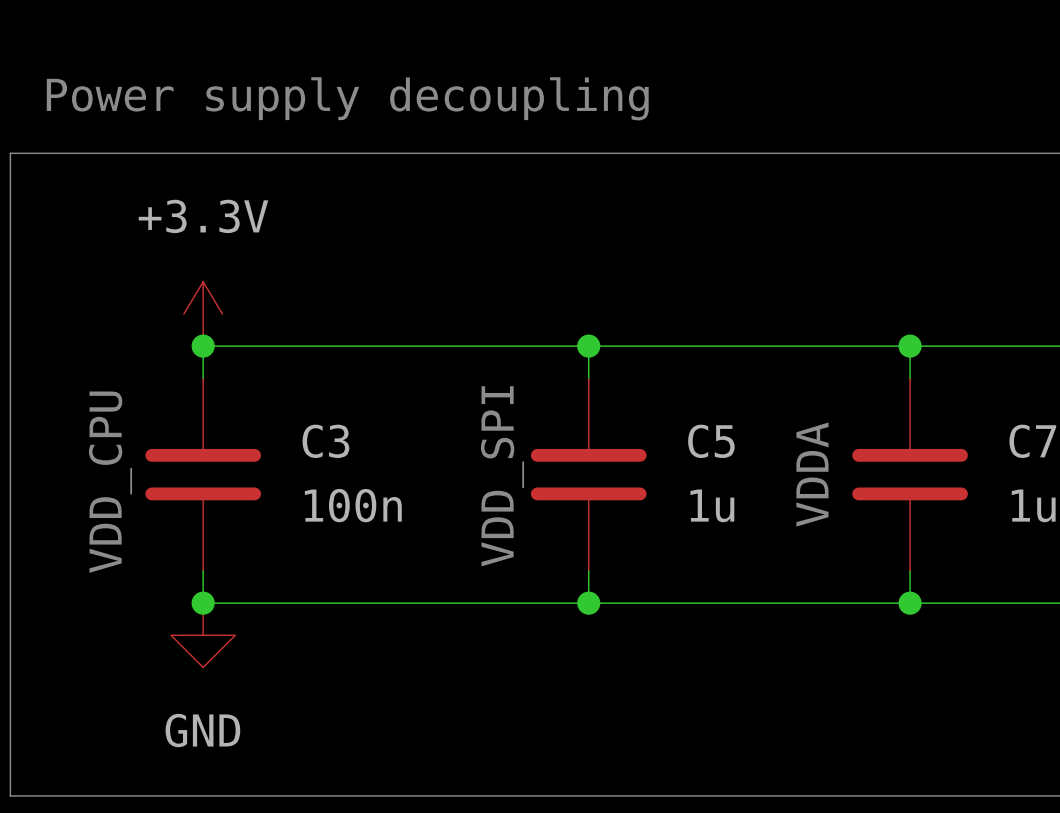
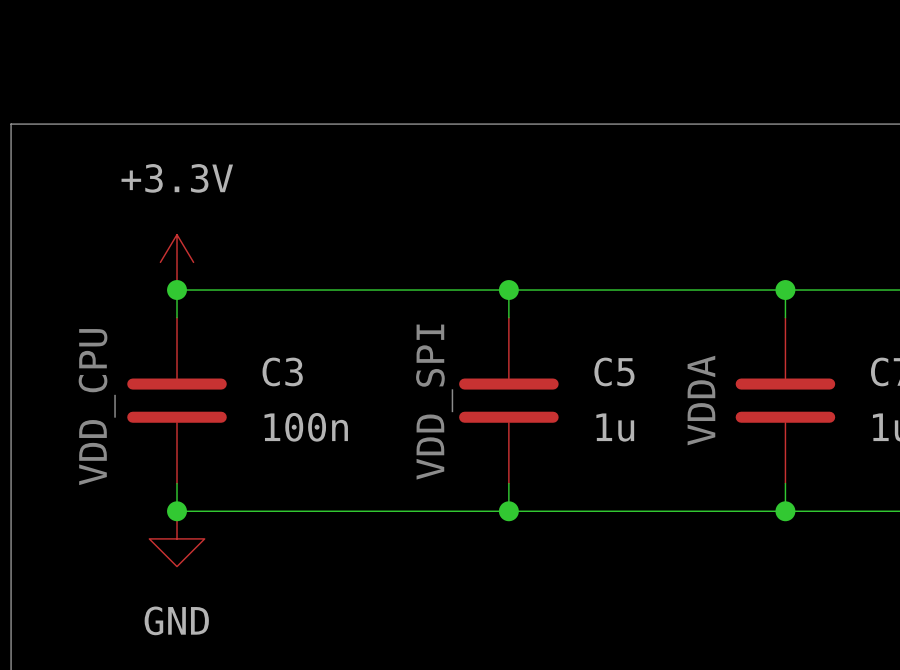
text: Power supply decoupling (347, 98) -> none

